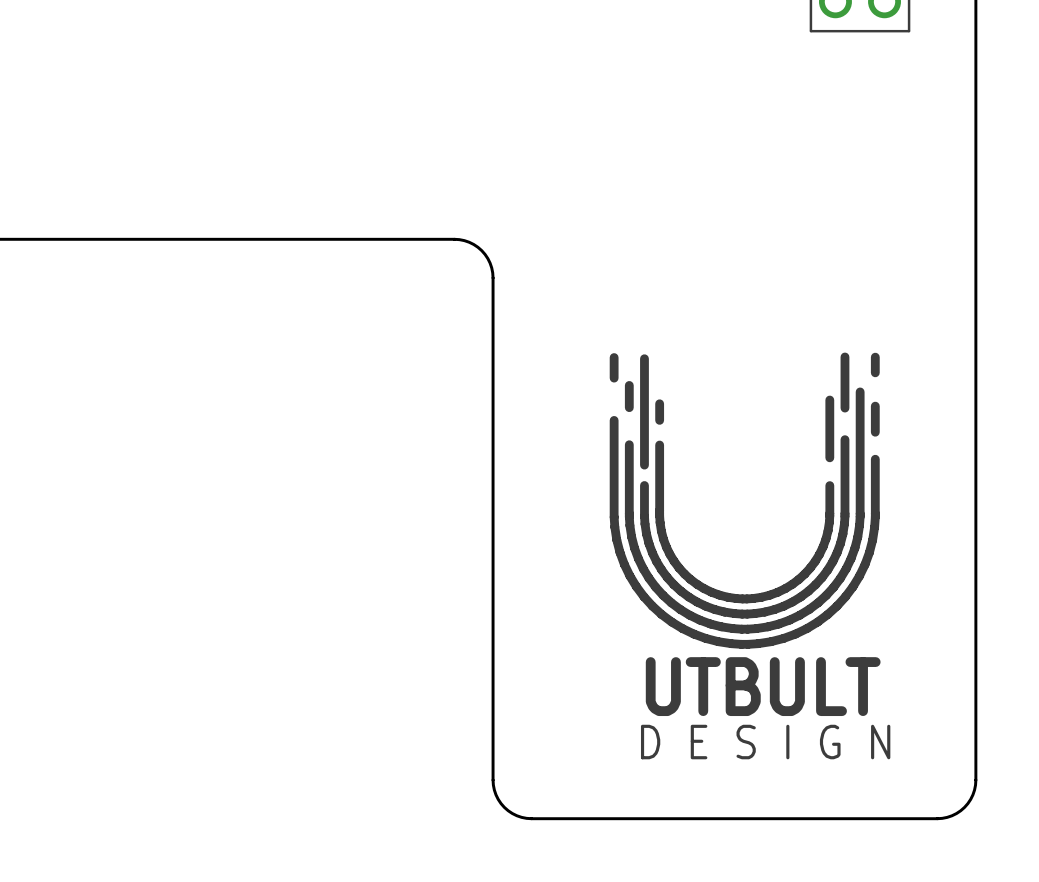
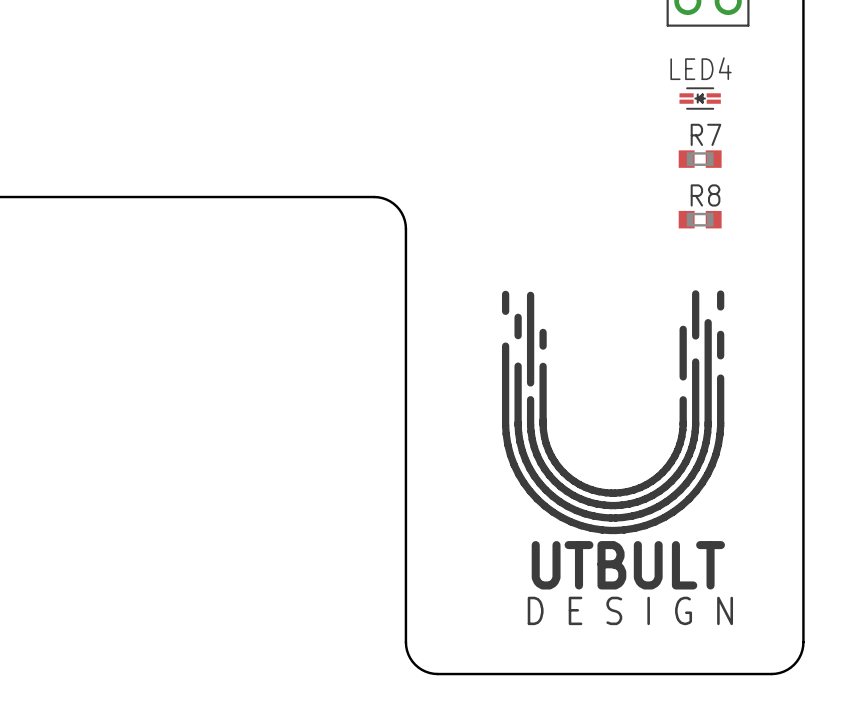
LED4: none -> (700, 98)
R7: none -> (700, 159)
R8: none -> (700, 219)

